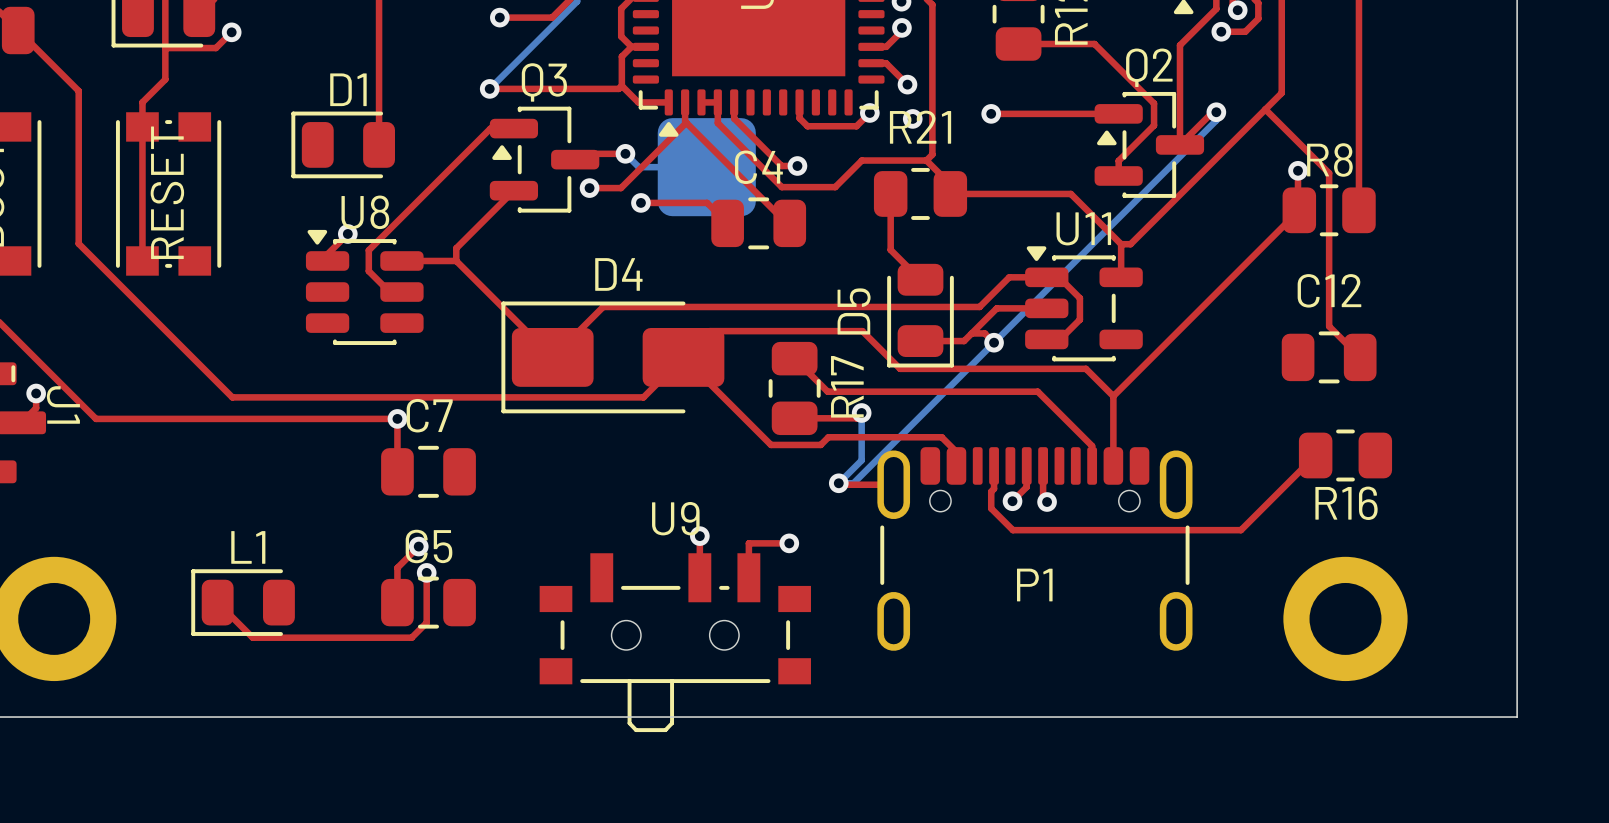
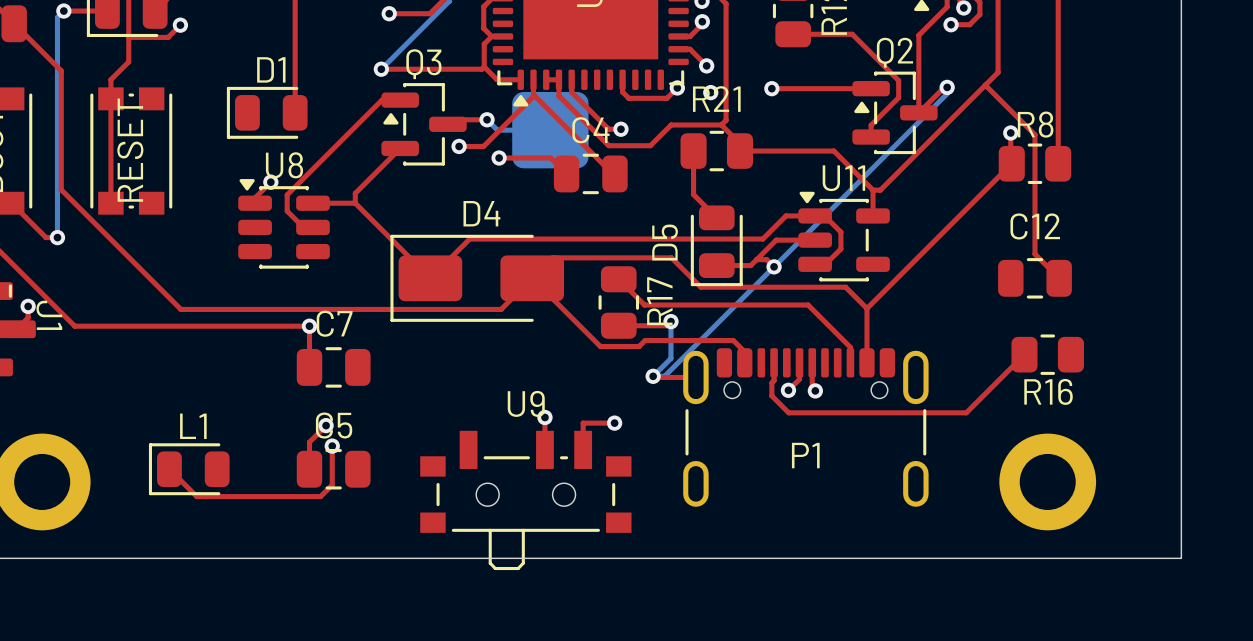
top track: none -> (63, 11) (107, 11)
bottom track: none -> (63, 11) (57, 17) (57, 237)
via: none -> (63, 11)
top track: none -> (11, 203) (46, 237) (57, 237)
via: none -> (57, 237)

